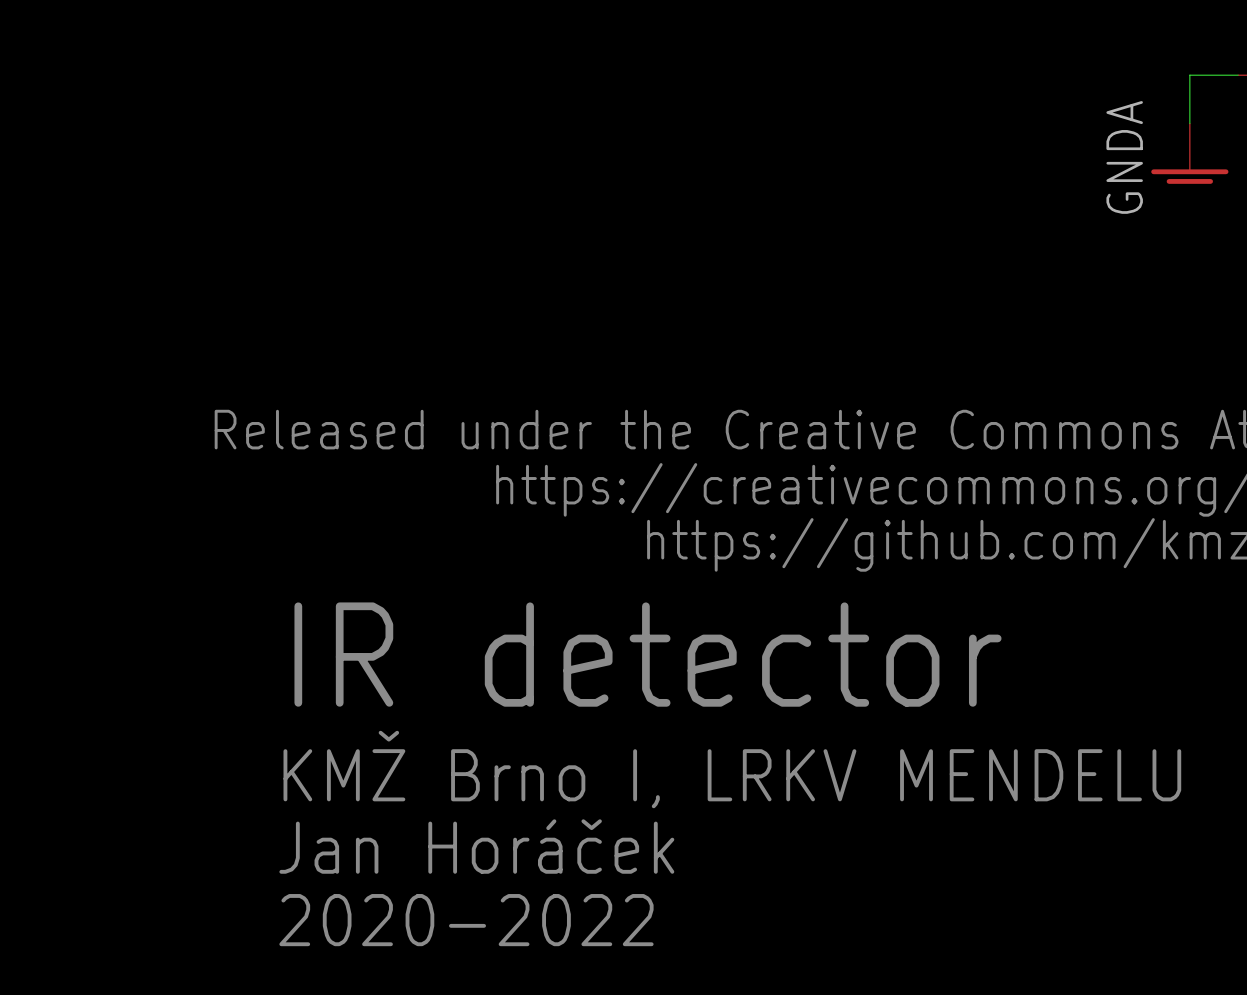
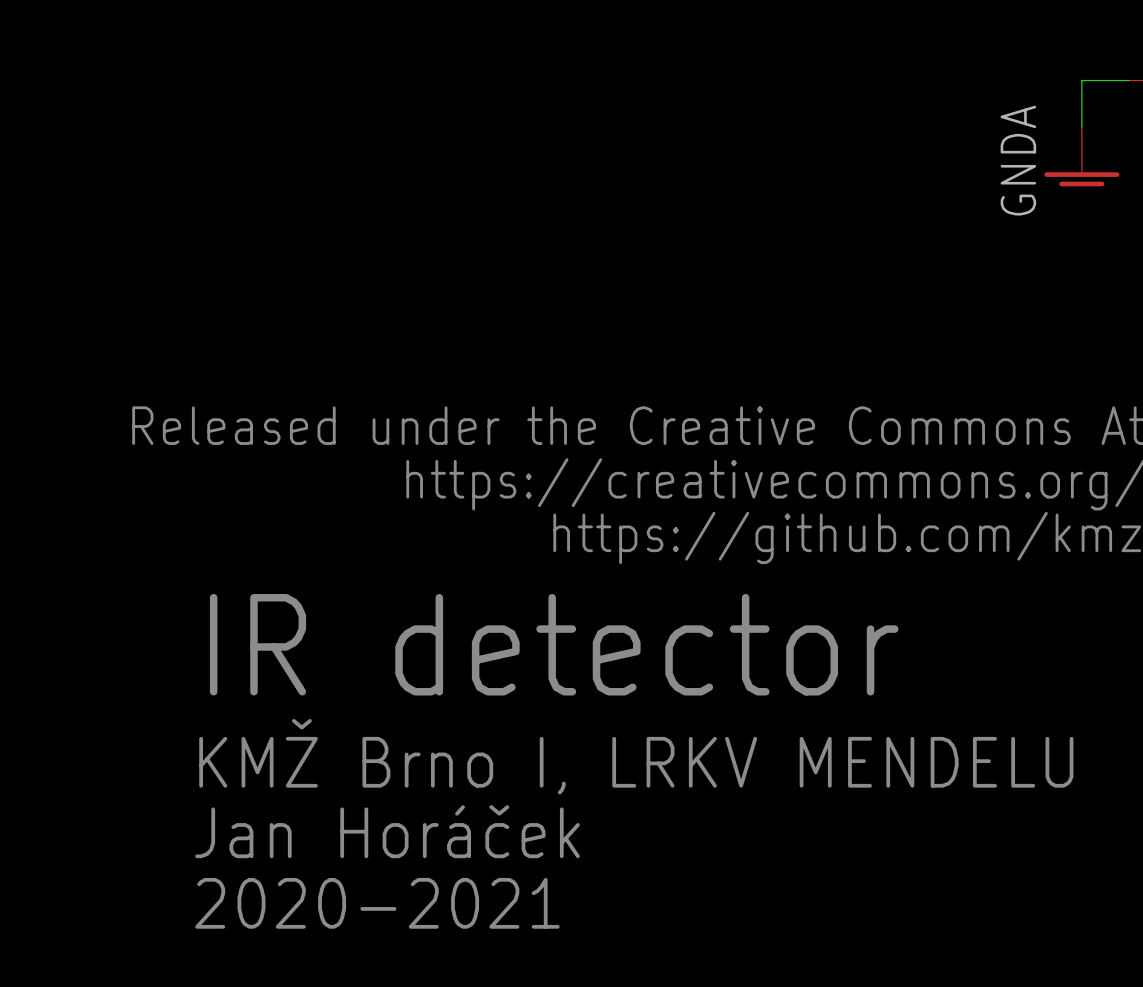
text: 2020-2022 (466, 920) -> 2020-2021 (377, 903)

